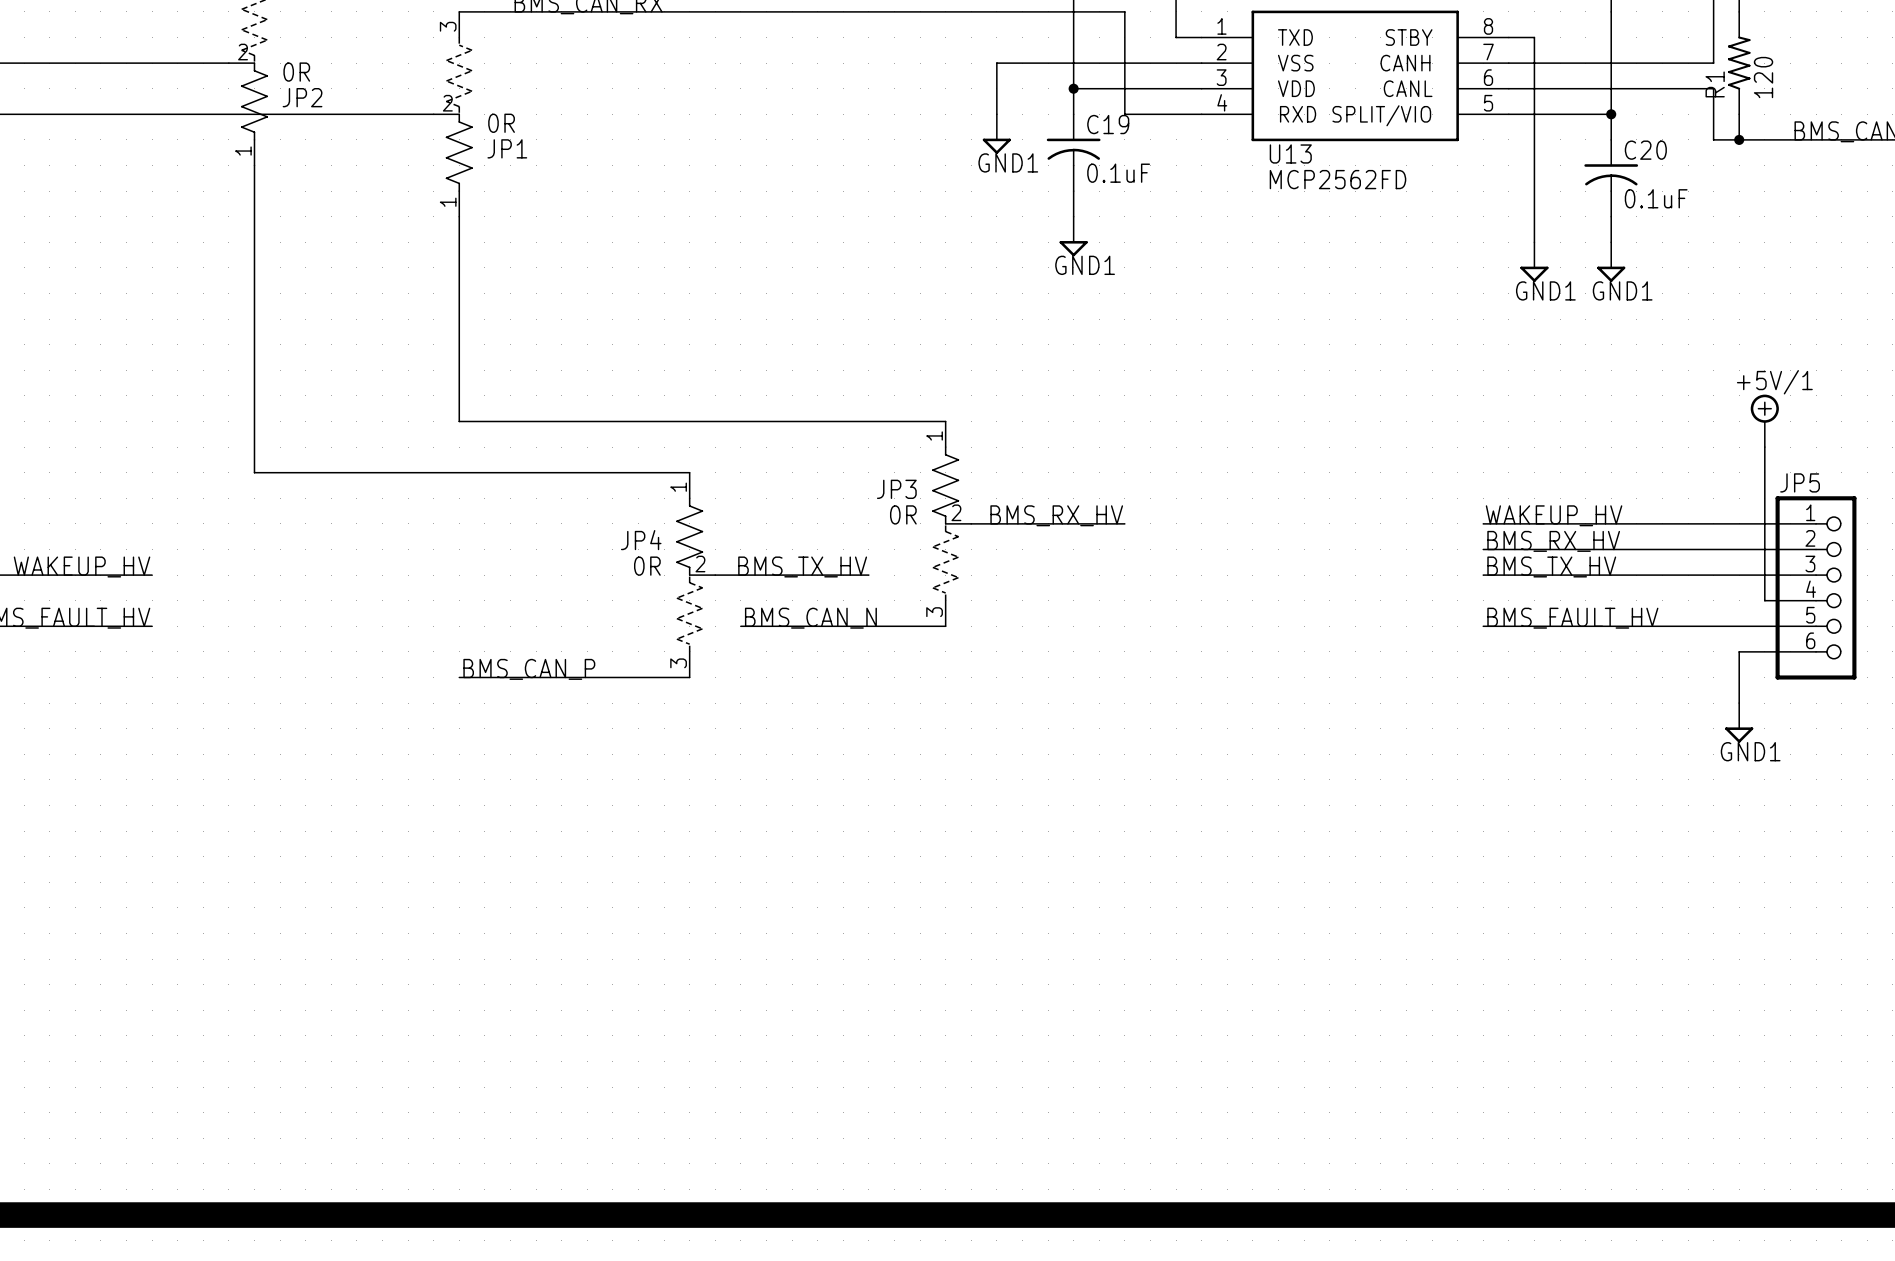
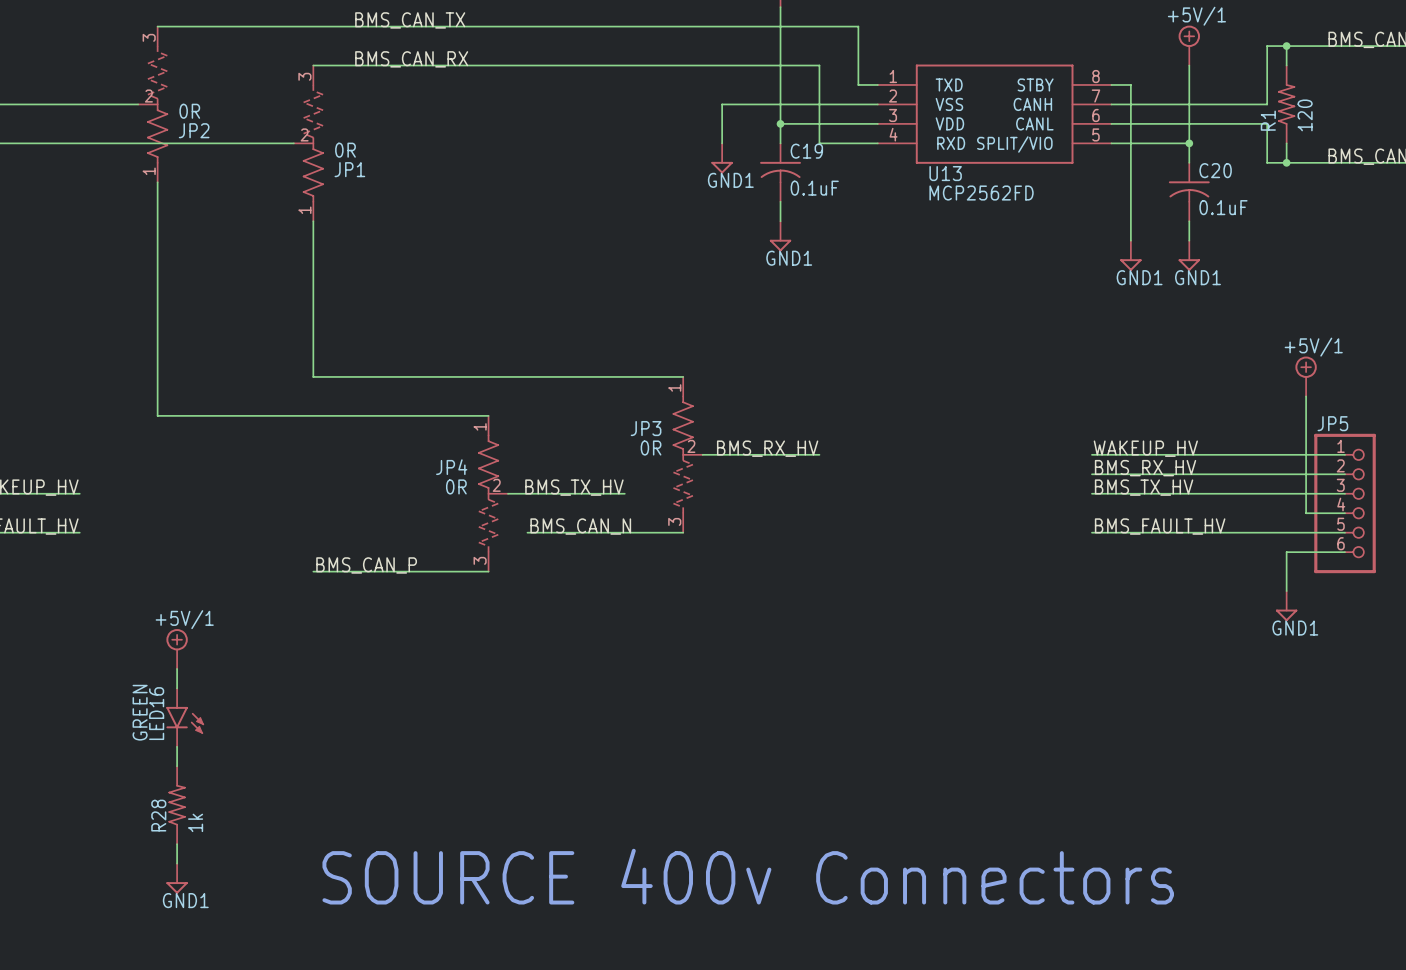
power symbol: none -> +5V/1 (177, 648)
wire: none -> (177, 668) (177, 688)
LED16: none -> GREEN (185, 717)
wire: none -> (177, 746) (177, 766)
R28: none -> 1k (177, 805)
wire: none -> (177, 844) (177, 863)
text: none -> SOURCE 400v Connectors (748, 876)
power symbol: none -> GND1 (177, 878)

